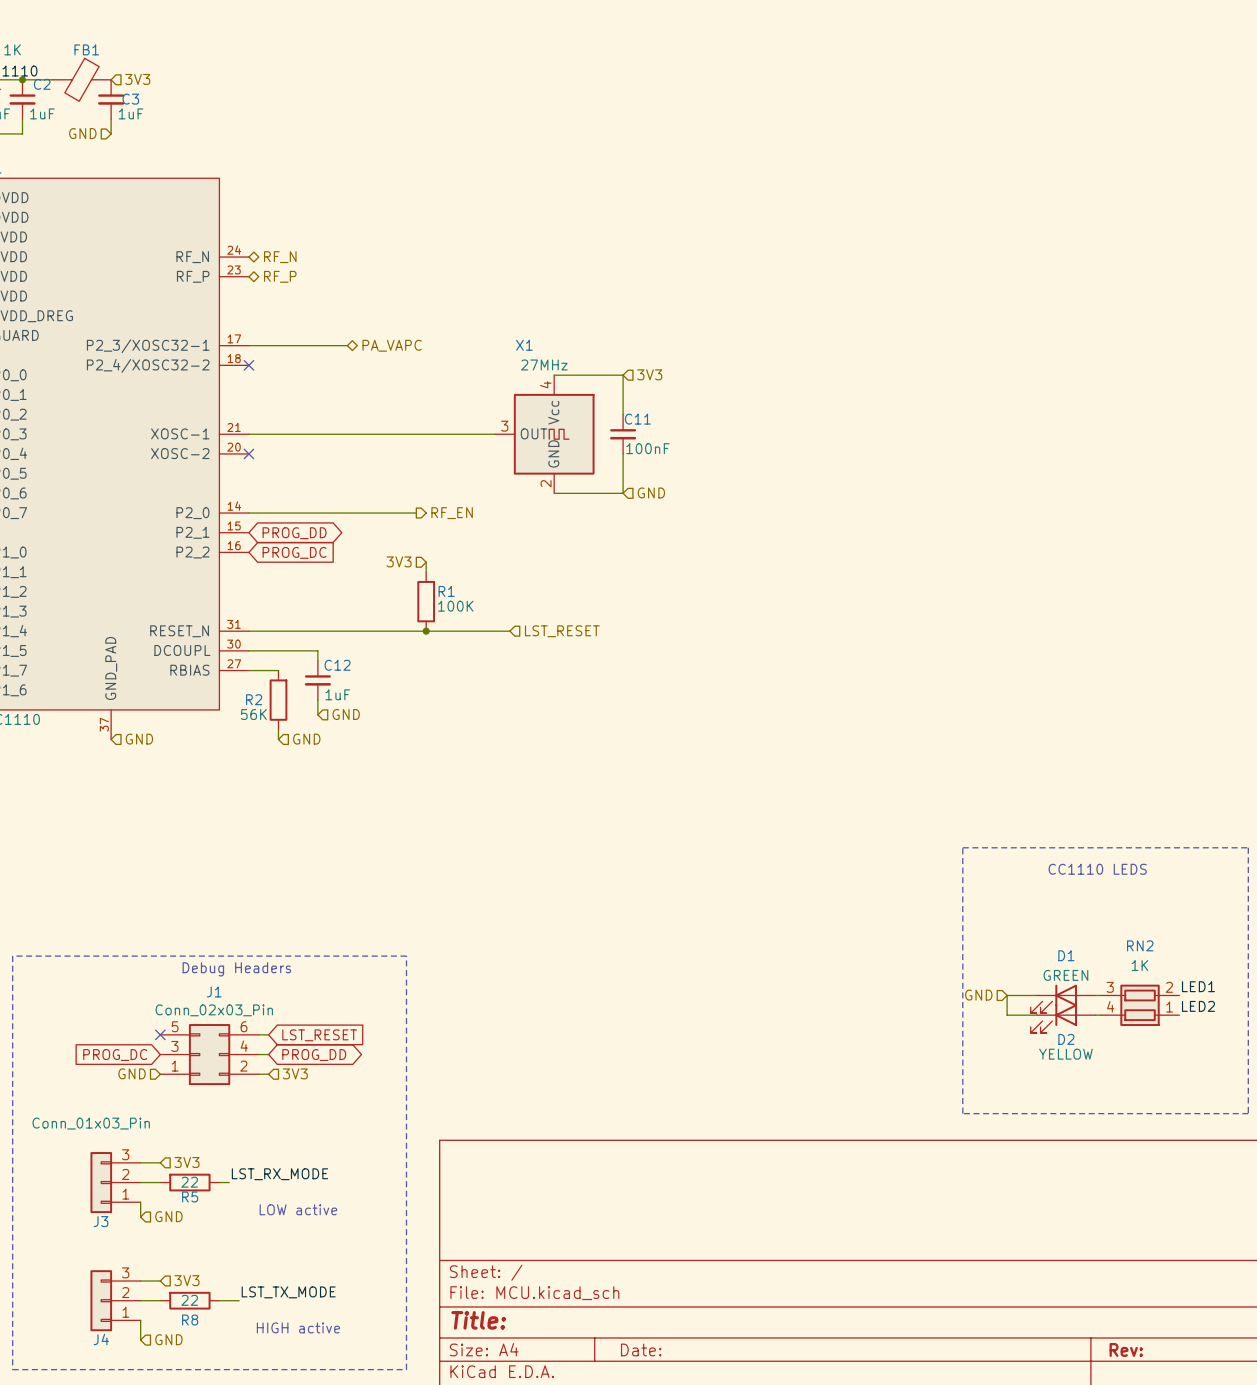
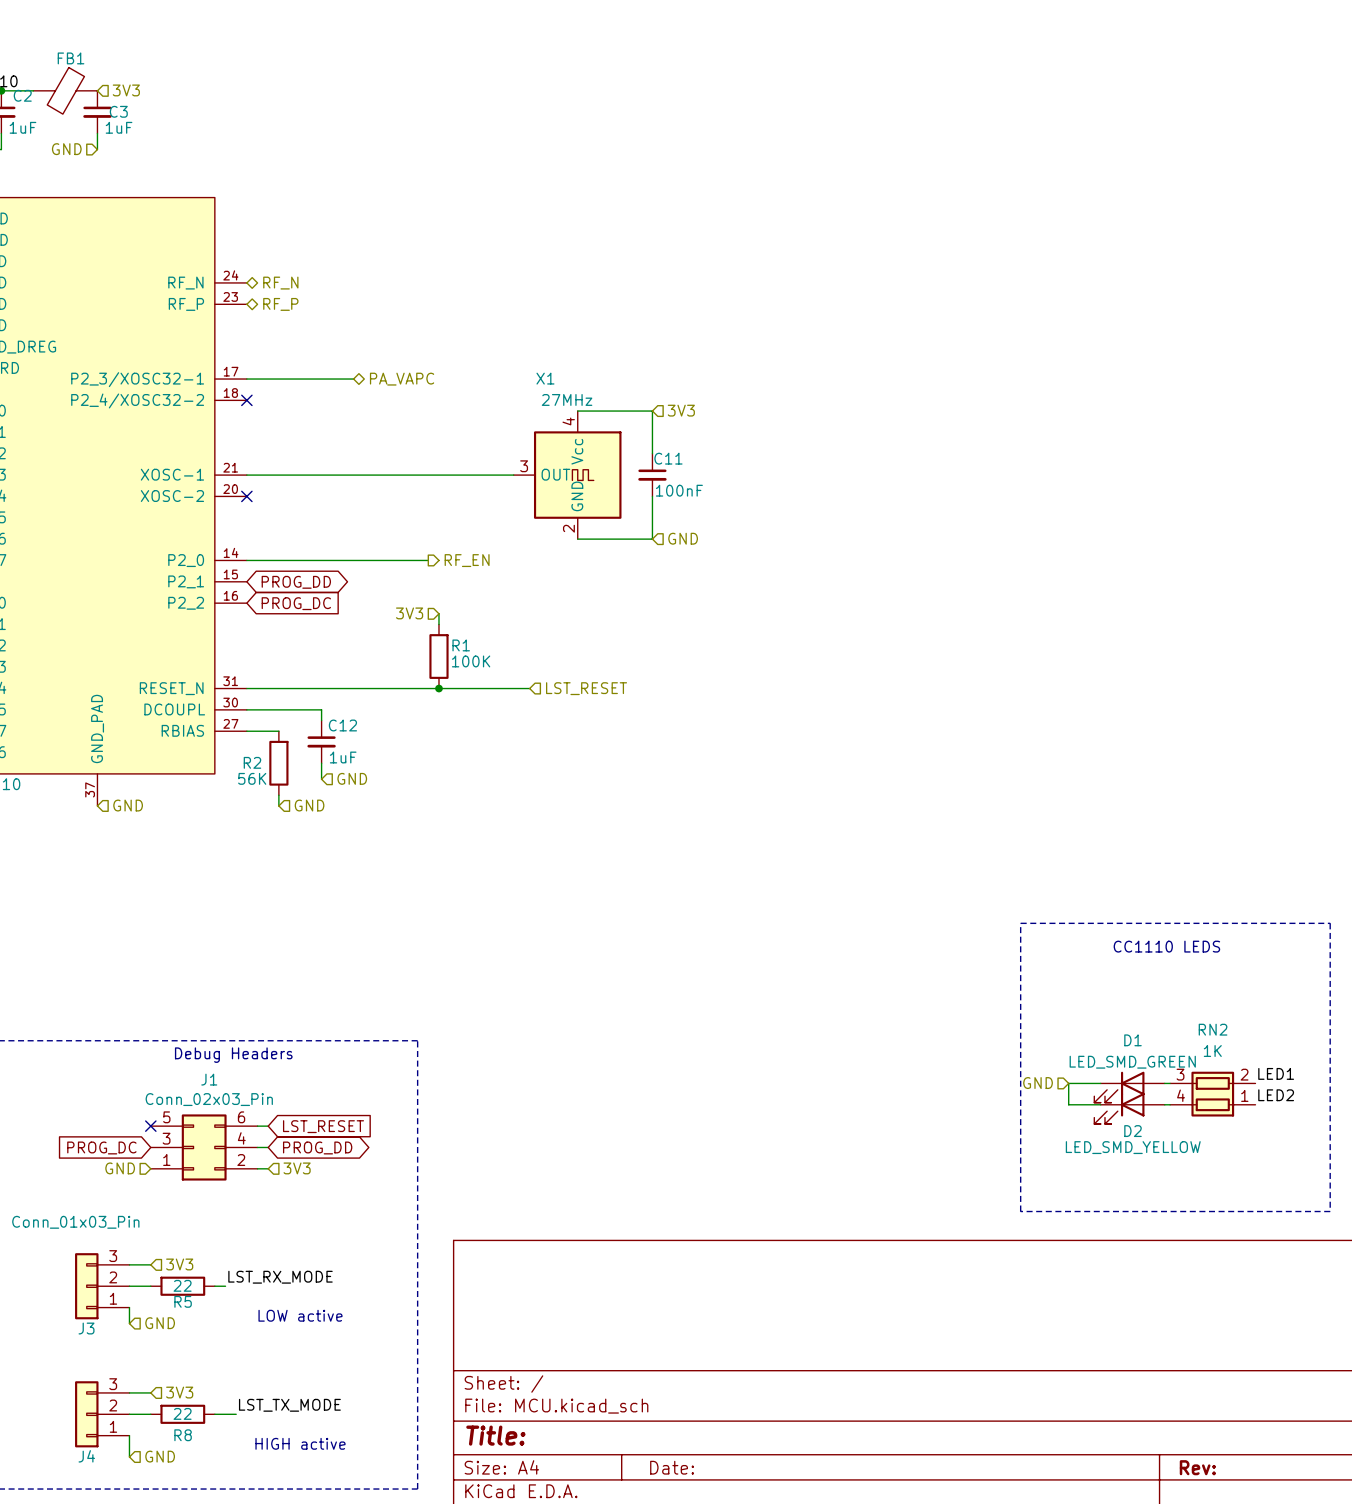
D1 value: GREEN (1065, 975) -> LED_SMD_GREEN (1132, 1062)
D2 value: YELLOW (1065, 1054) -> LED_SMD_YELLOW (1133, 1147)

